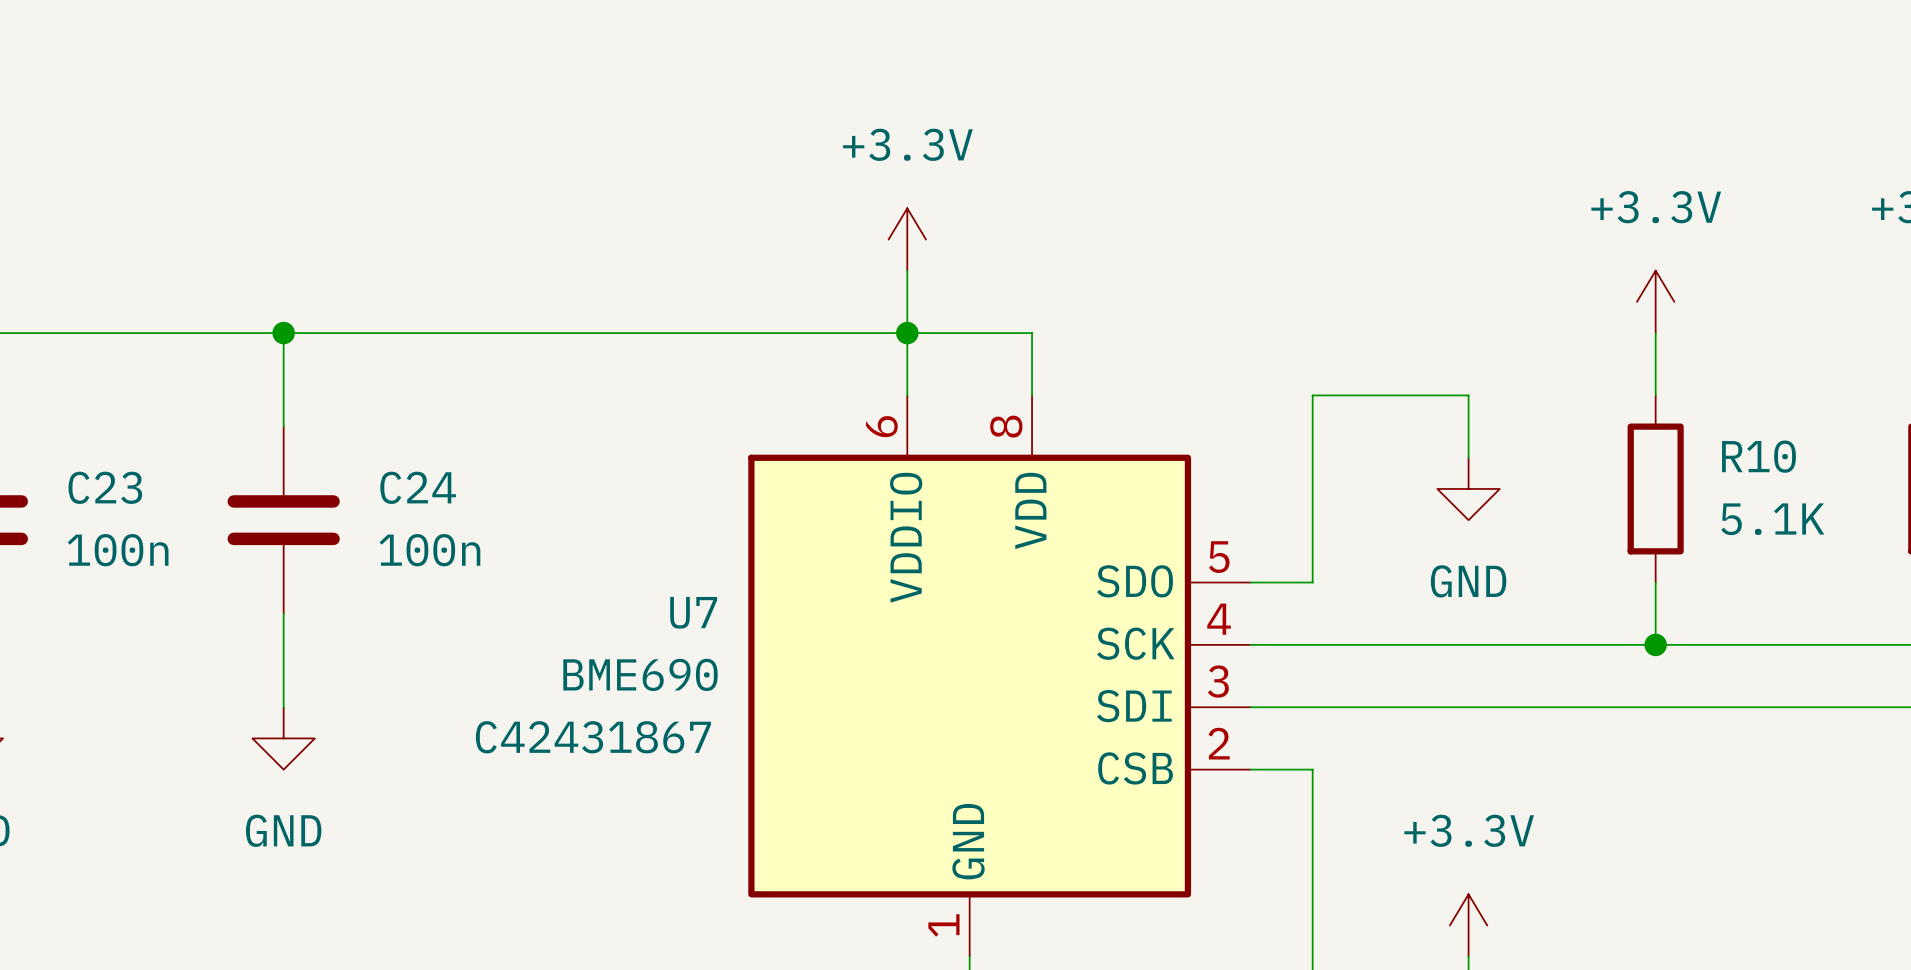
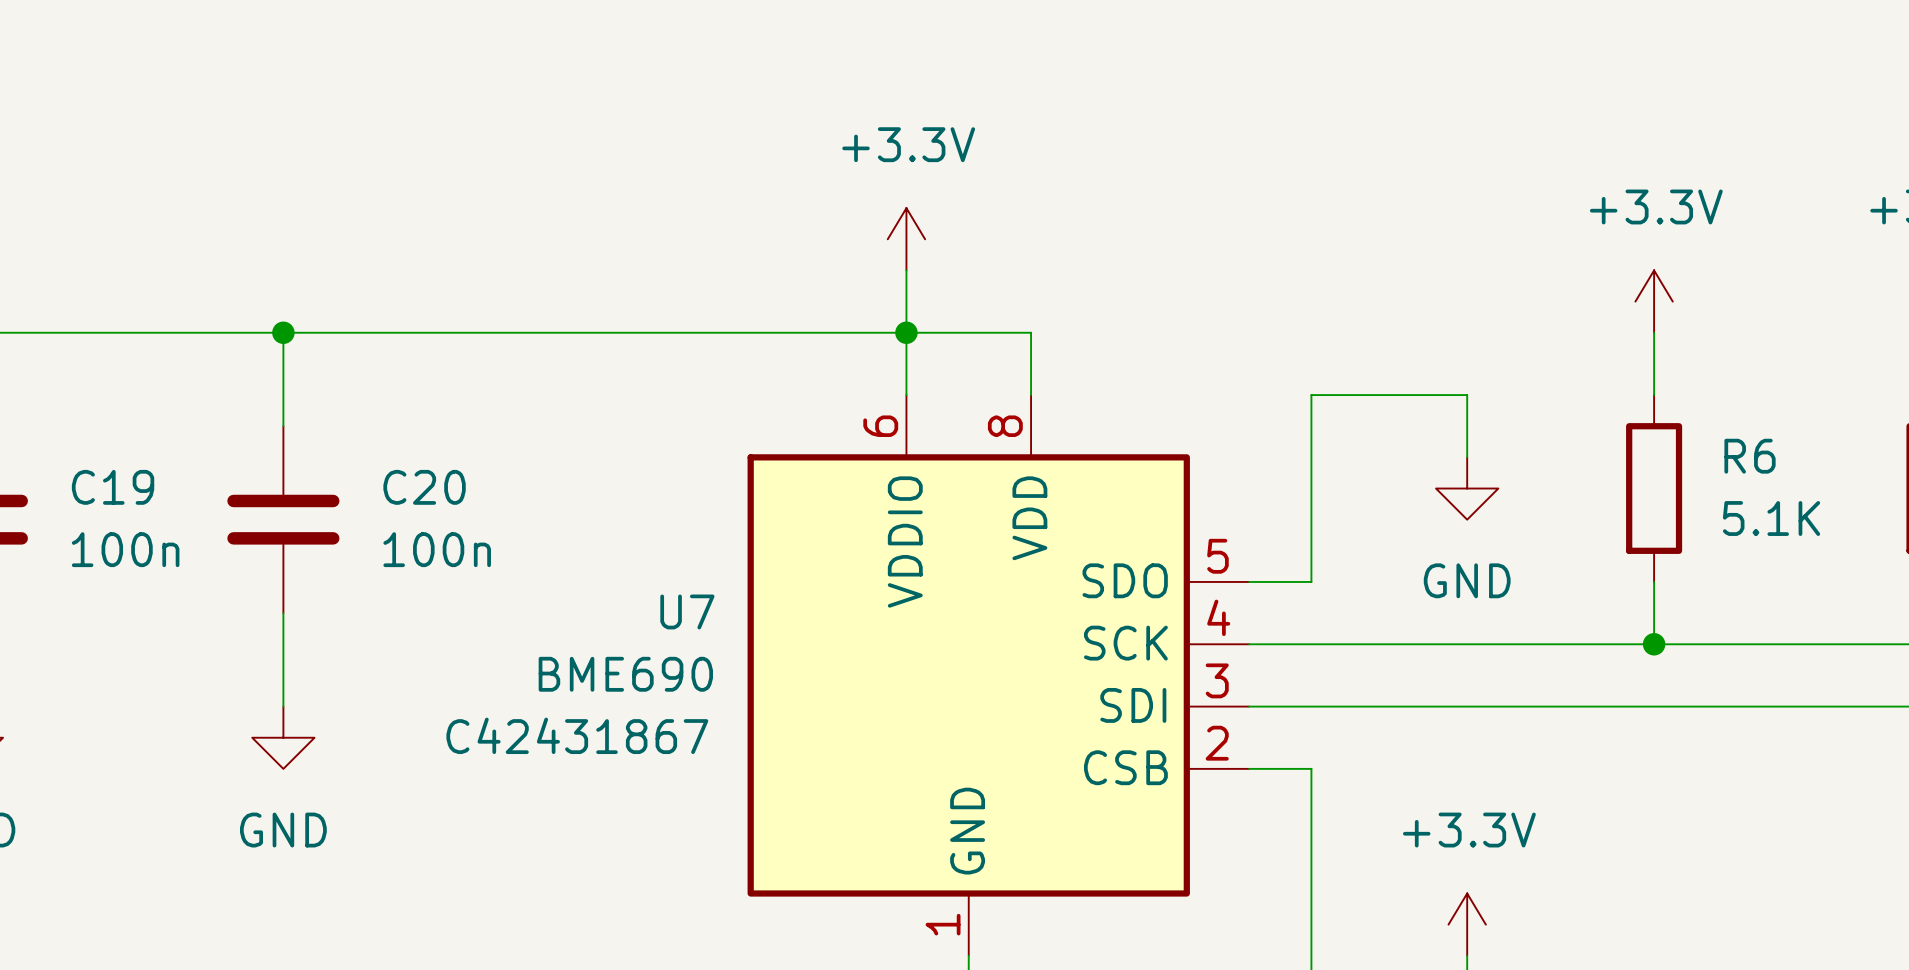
R10 name: R10 (1758, 456) -> R6 (1750, 456)
C23 name: C23 (105, 487) -> C19 (113, 487)
C24 name: C24 (418, 487) -> C20 (424, 487)

